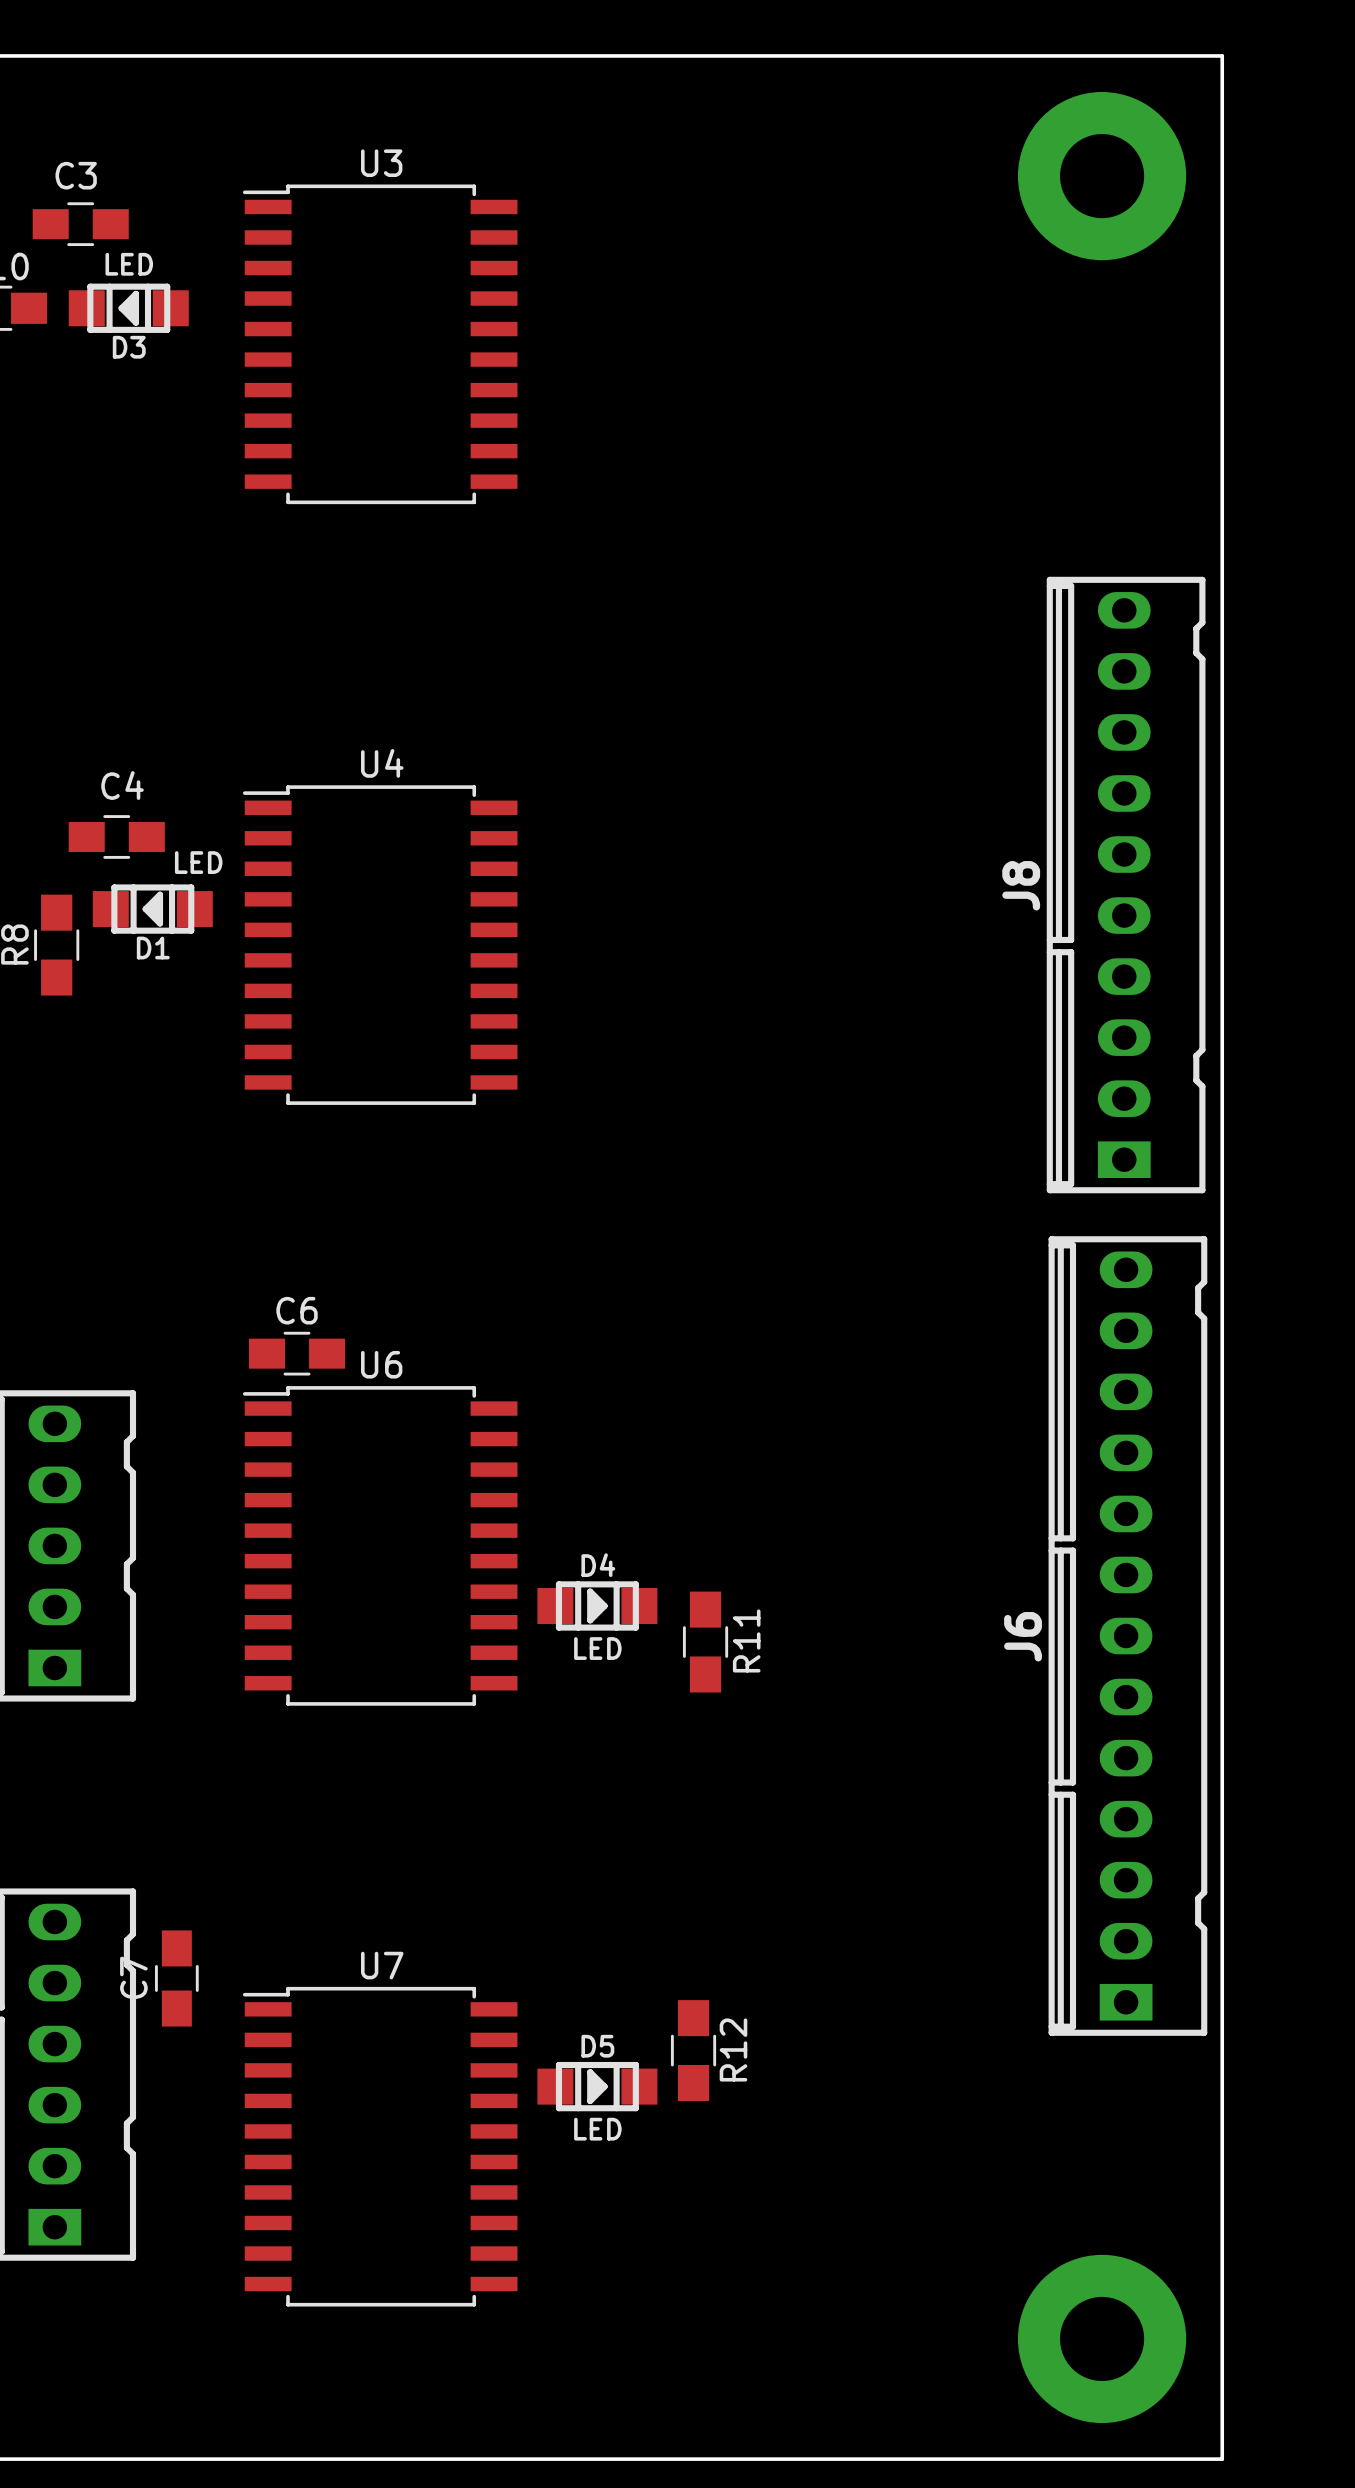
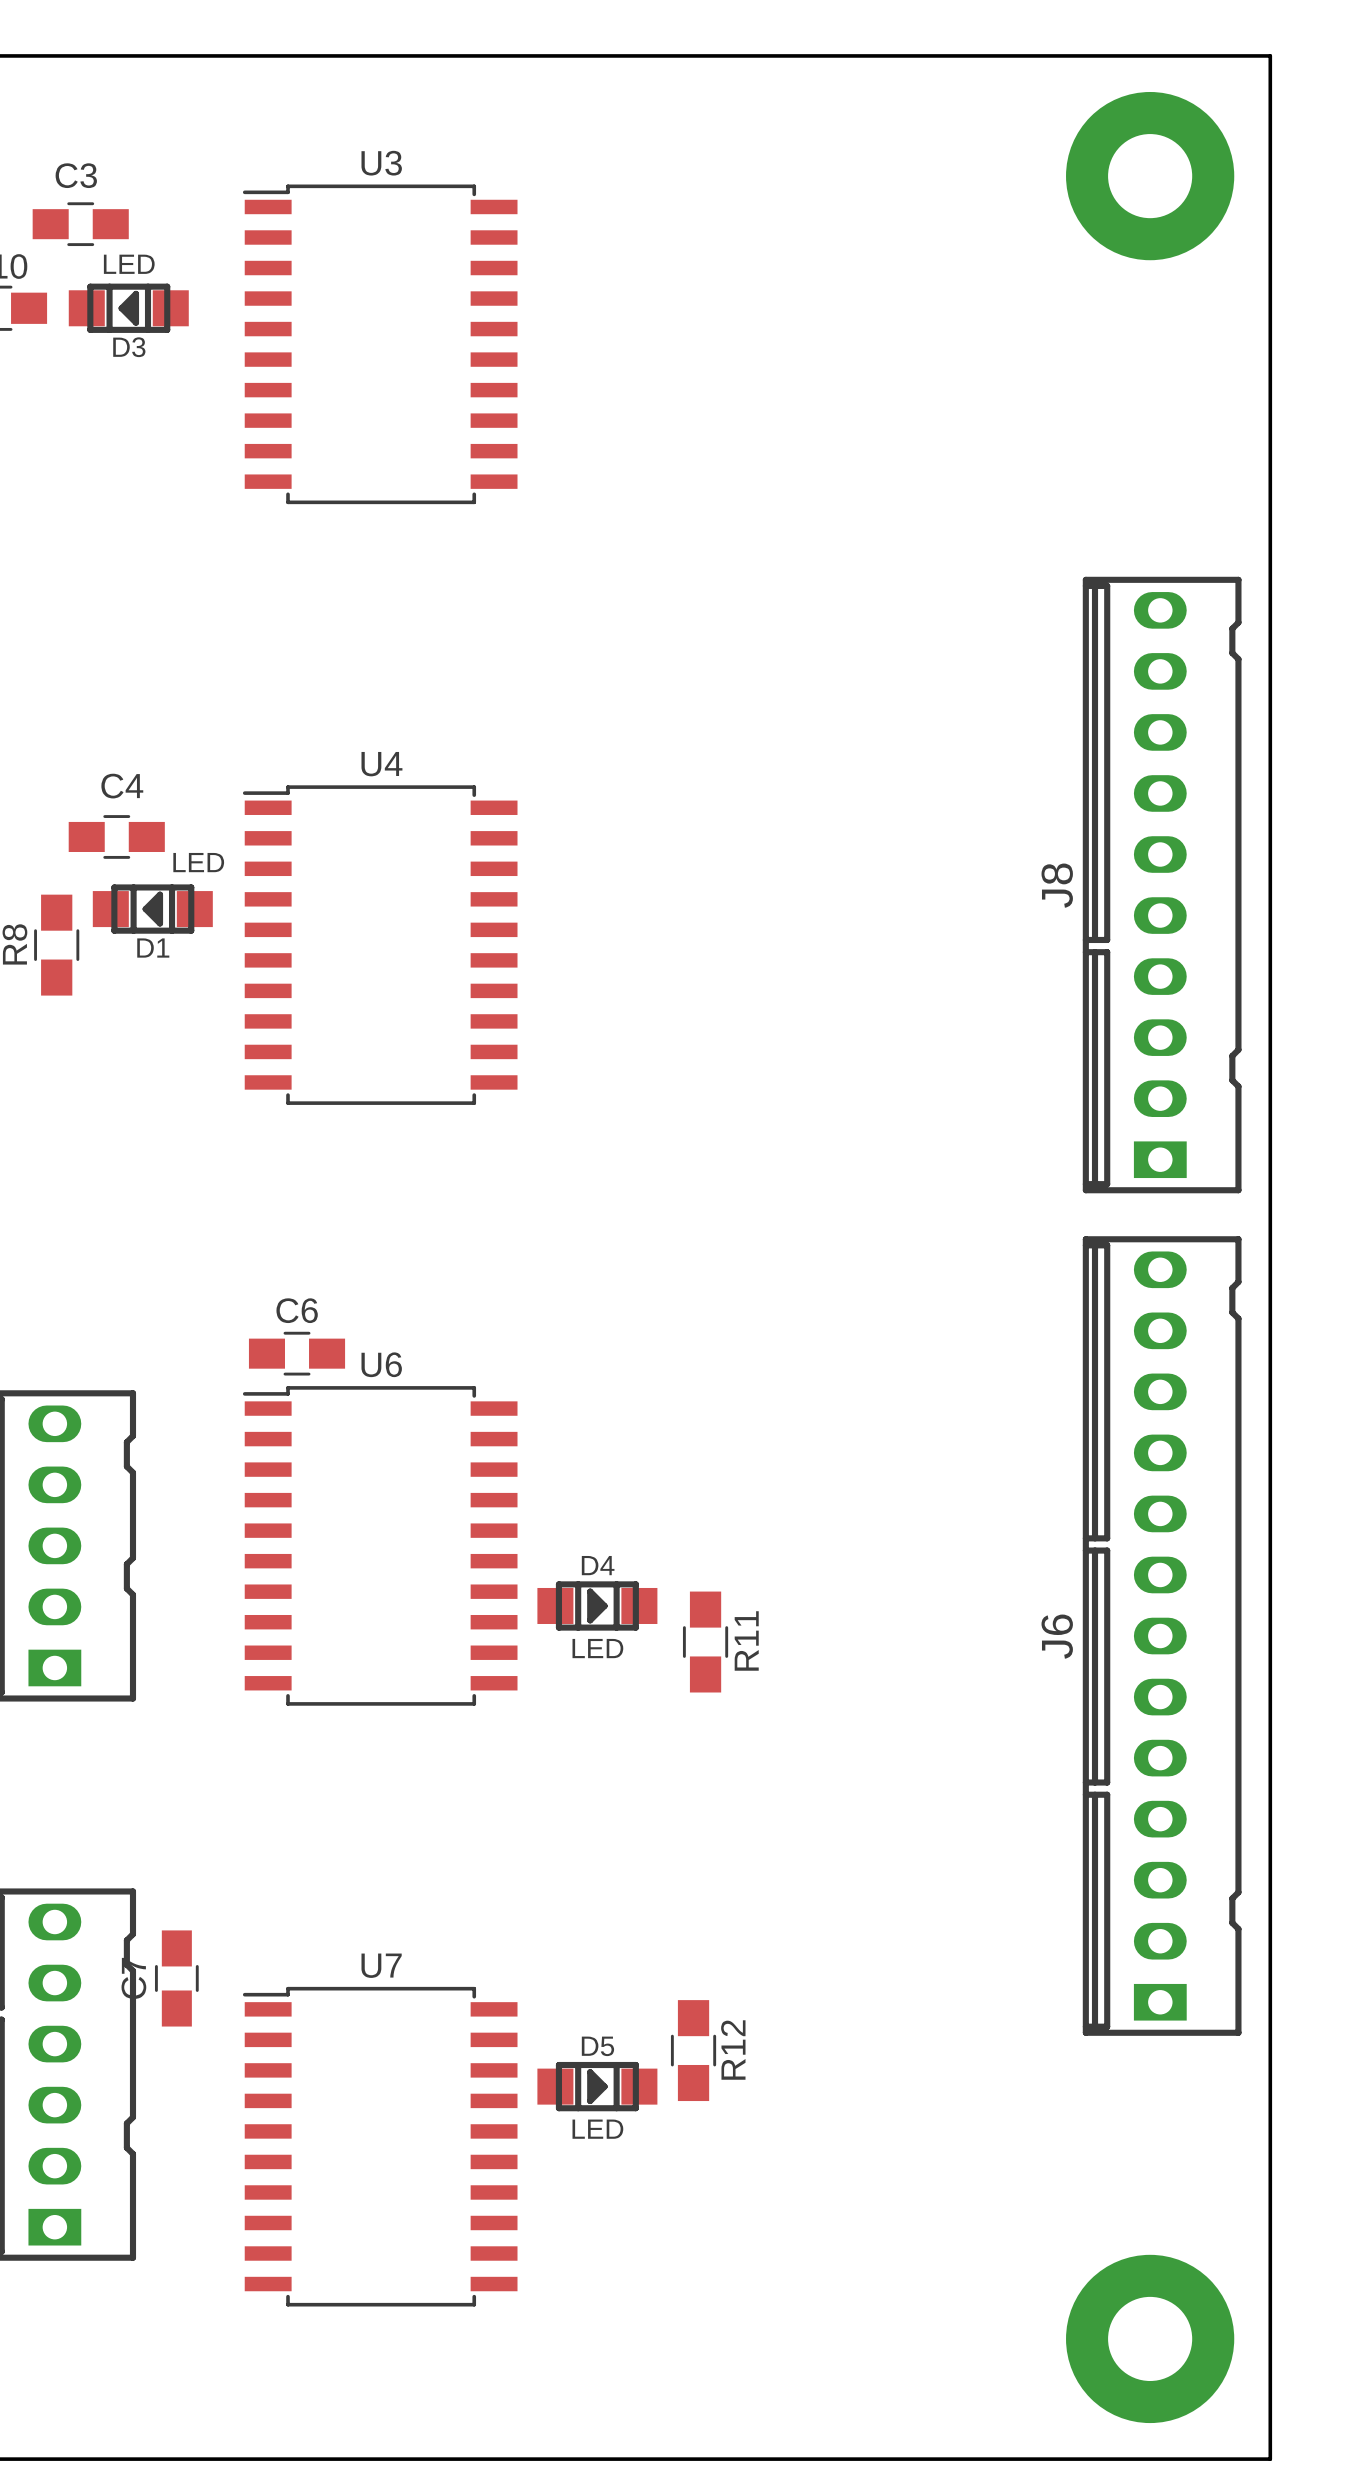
board edge: (1222, 55) (1222, 2459) -> (1222, 55) (1270, 55) (1270, 2459) (1222, 2459)
part position: (1102, 176) -> (1150, 176)
J8 position: (1126, 885) -> (1162, 885)
J6 position: (1127, 1636) -> (1162, 1636)
part position: (1102, 2338) -> (1150, 2338)

